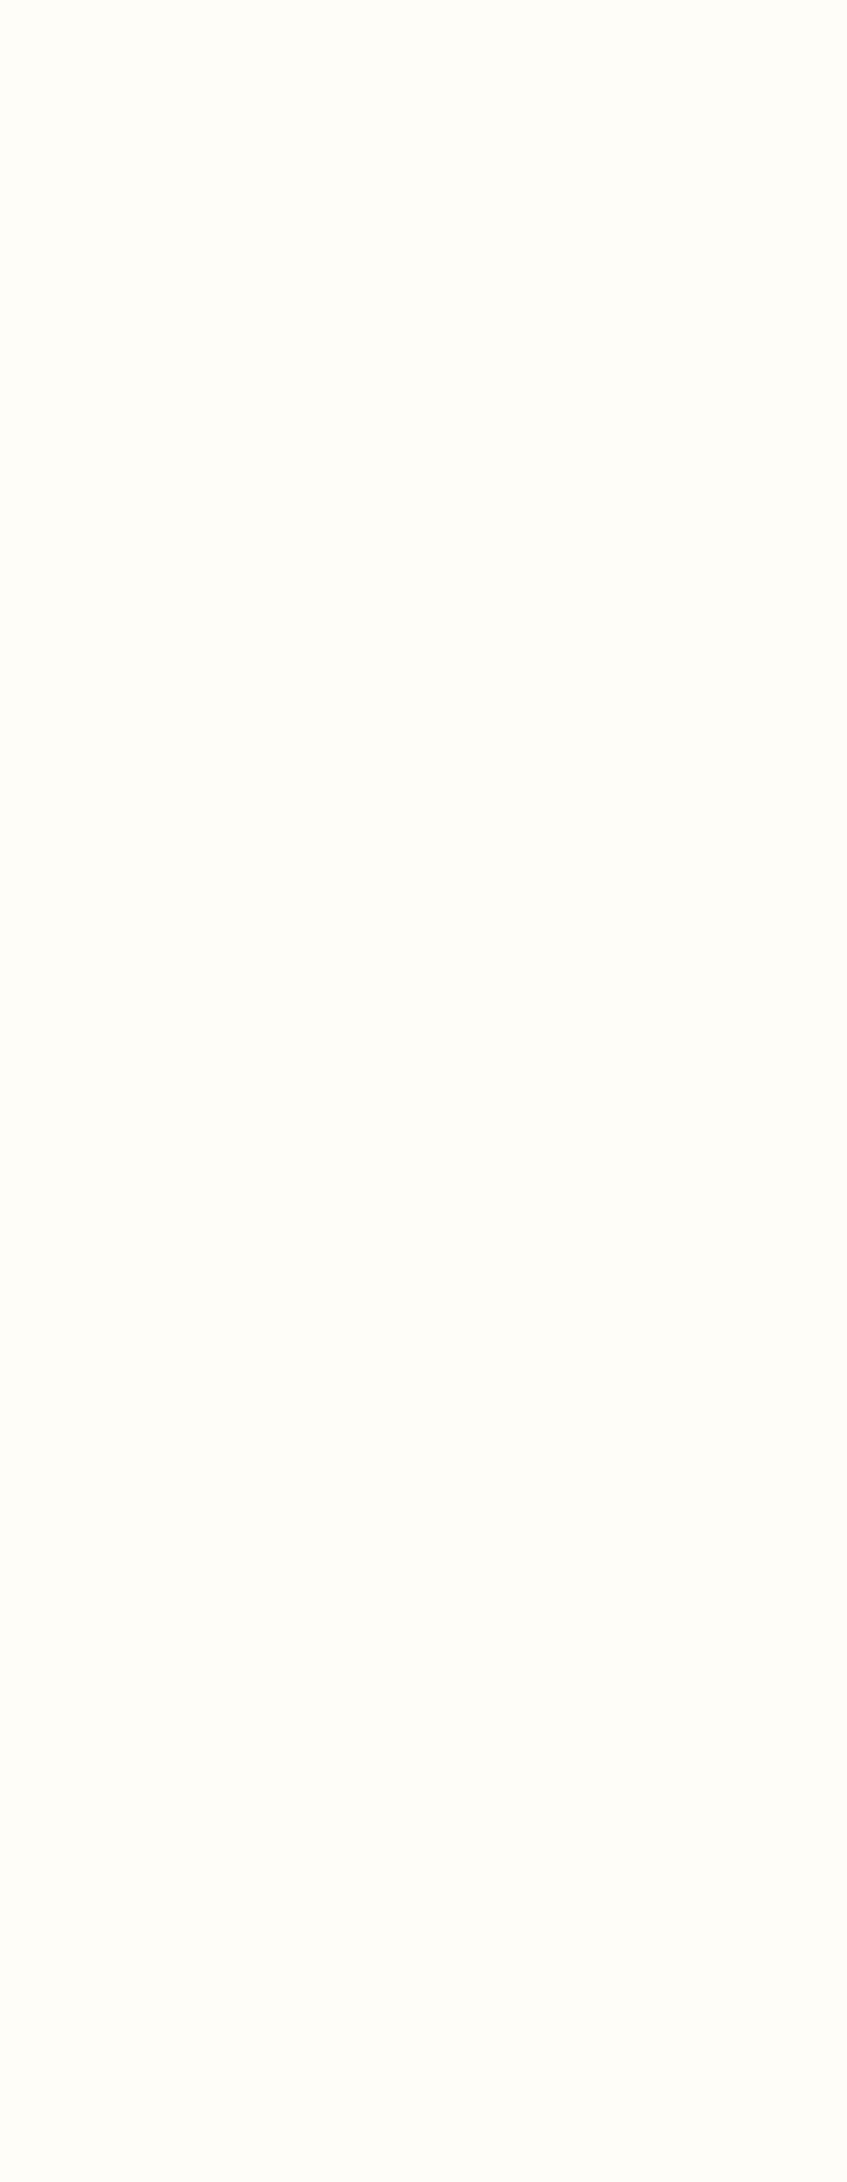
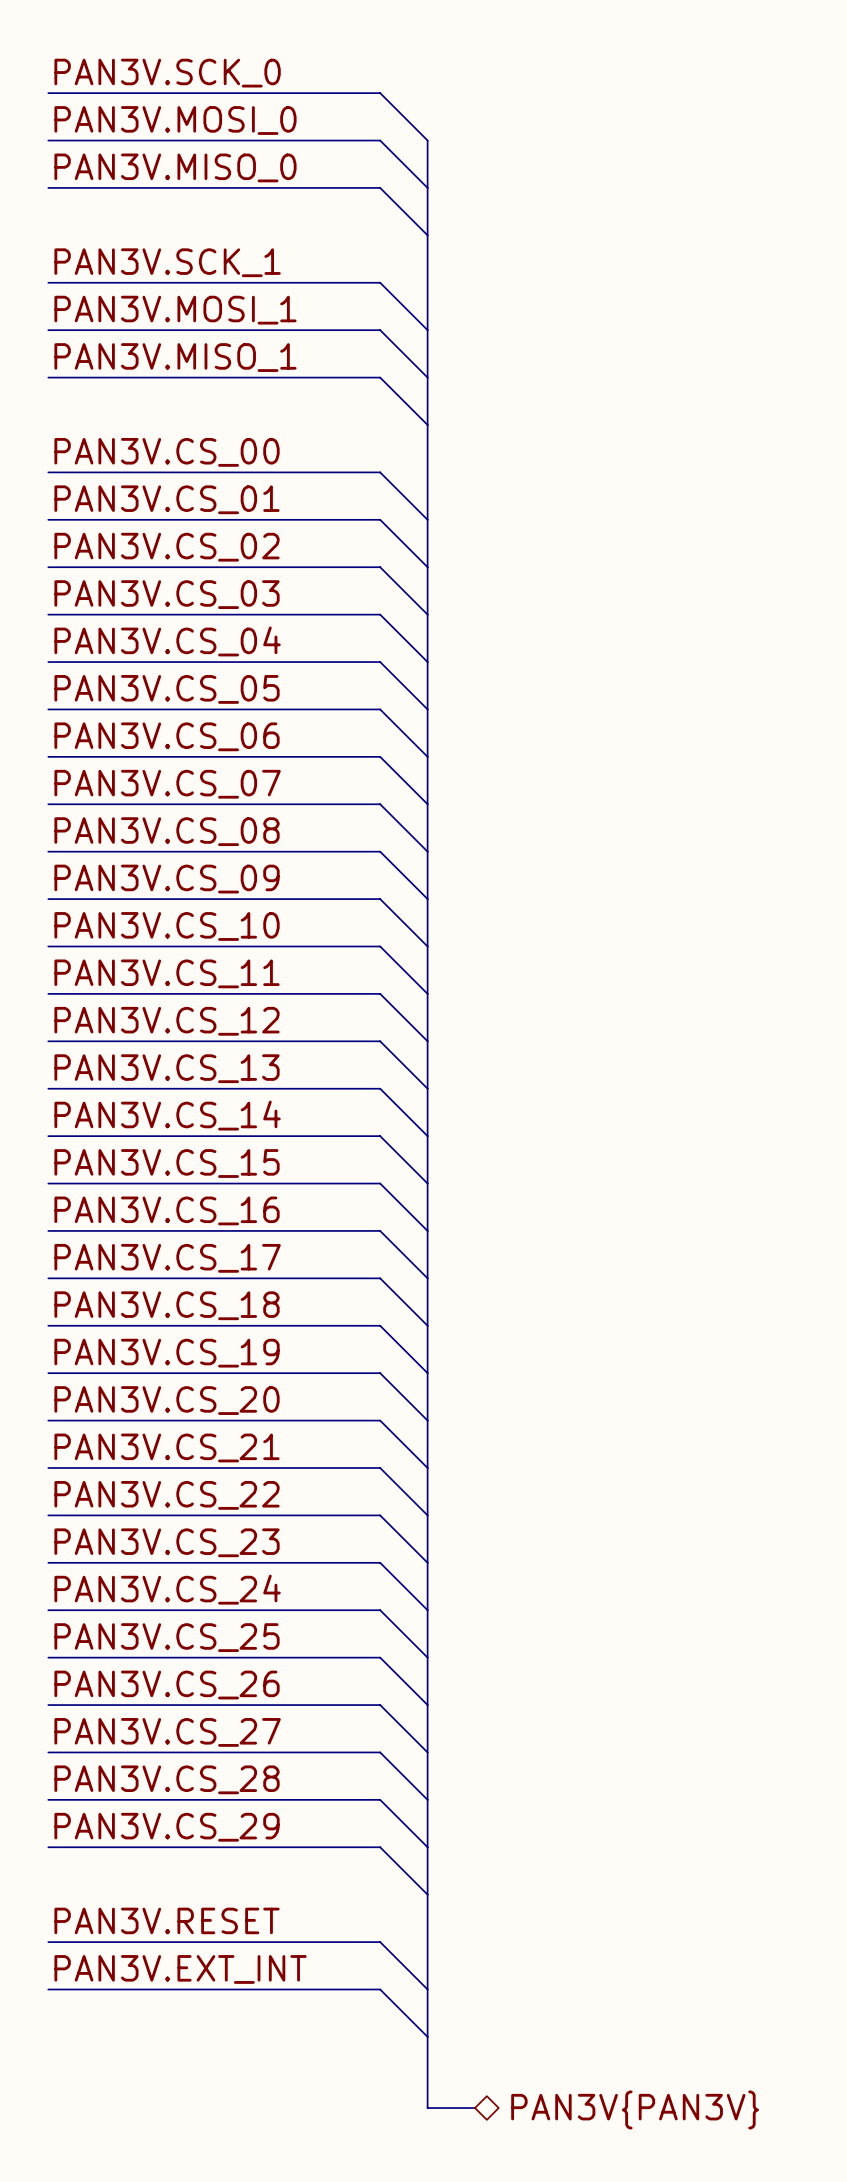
label: none -> PAN3V.SCK_0 (167, 73)
wire: none -> (48, 93) (380, 93) (427, 140)
label: none -> PAN3V.MOSI_0 (175, 120)
wire: none -> (48, 140) (380, 140) (427, 187)
bus: none -> (427, 140) (427, 2108) (475, 2108)
label: none -> PAN3V.MISO_0 (175, 167)
wire: none -> (48, 187) (380, 187) (427, 235)
label: none -> PAN3V.SCK_1 (167, 262)
wire: none -> (48, 282) (380, 282) (427, 330)
label: none -> PAN3V.MOSI_1 (175, 310)
wire: none -> (48, 330) (380, 330) (427, 377)
label: none -> PAN3V.MISO_1 (175, 357)
wire: none -> (48, 377) (380, 377) (427, 424)
label: none -> PAN3V.CS_00 (167, 452)
wire: none -> (48, 472) (380, 472) (427, 519)
label: none -> PAN3V.CS_01 (167, 499)
wire: none -> (48, 519) (380, 519) (427, 567)
label: none -> PAN3V.CS_02 (167, 547)
wire: none -> (48, 567) (380, 567) (427, 614)
label: none -> PAN3V.CS_03 (167, 594)
wire: none -> (48, 614) (380, 614) (427, 662)
label: none -> PAN3V.CS_04 (167, 641)
wire: none -> (48, 662) (380, 662) (427, 709)
label: none -> PAN3V.CS_05 (167, 689)
wire: none -> (48, 709) (380, 709) (427, 756)
label: none -> PAN3V.CS_06 (167, 736)
wire: none -> (48, 756) (380, 756) (427, 804)
label: none -> PAN3V.CS_07 (167, 784)
wire: none -> (48, 804) (380, 804) (427, 851)
label: none -> PAN3V.CS_08 (167, 831)
wire: none -> (48, 851) (380, 851) (427, 899)
label: none -> PAN3V.CS_09 (167, 879)
wire: none -> (48, 899) (380, 899) (427, 946)
label: none -> PAN3V.CS_10 (167, 926)
wire: none -> (48, 946) (380, 946) (427, 993)
label: none -> PAN3V.CS_11 (167, 973)
wire: none -> (48, 993) (380, 993) (427, 1041)
label: none -> PAN3V.CS_12 (167, 1021)
wire: none -> (48, 1041) (380, 1041) (427, 1088)
label: none -> PAN3V.CS_13 (167, 1068)
wire: none -> (48, 1088) (380, 1088) (427, 1136)
label: none -> PAN3V.CS_14 (167, 1115)
wire: none -> (48, 1136) (380, 1136) (427, 1183)
label: none -> PAN3V.CS_15 (167, 1163)
wire: none -> (48, 1183) (380, 1183) (427, 1230)
label: none -> PAN3V.CS_16 (167, 1210)
wire: none -> (48, 1230) (380, 1230) (427, 1278)
label: none -> PAN3V.CS_17 (167, 1258)
wire: none -> (48, 1278) (380, 1278) (427, 1325)
label: none -> PAN3V.CS_18 (167, 1305)
wire: none -> (48, 1325) (380, 1325) (427, 1373)
label: none -> PAN3V.CS_19 (167, 1353)
wire: none -> (48, 1373) (380, 1373) (427, 1420)
label: none -> PAN3V.CS_20 (167, 1400)
wire: none -> (48, 1420) (380, 1420) (427, 1468)
label: none -> PAN3V.CS_21 (167, 1447)
wire: none -> (48, 1468) (380, 1468) (427, 1515)
label: none -> PAN3V.CS_22 (167, 1495)
wire: none -> (48, 1515) (380, 1515) (427, 1562)
label: none -> PAN3V.CS_23 (167, 1542)
wire: none -> (48, 1562) (380, 1562) (427, 1610)
label: none -> PAN3V.CS_24 (167, 1589)
wire: none -> (48, 1610) (380, 1610) (427, 1657)
label: none -> PAN3V.CS_25 (167, 1637)
wire: none -> (48, 1657) (380, 1657) (427, 1705)
label: none -> PAN3V.CS_26 (167, 1685)
wire: none -> (48, 1705) (380, 1705) (427, 1752)
label: none -> PAN3V.CS_27 (167, 1732)
wire: none -> (48, 1752) (380, 1752) (427, 1799)
label: none -> PAN3V.CS_28 (167, 1779)
wire: none -> (48, 1799) (380, 1799) (427, 1847)
label: none -> PAN3V.CS_29 (167, 1827)
wire: none -> (48, 1847) (380, 1847) (427, 1894)
label: none -> PAN3V.RESET (167, 1920)
wire: none -> (48, 1942) (380, 1942) (427, 1989)
label: none -> PAN3V.EXT_INT (180, 1969)
wire: none -> (48, 1989) (380, 1989) (427, 2036)
hierarchical label: none -> PAN3V{PAN3V} (635, 2109)

